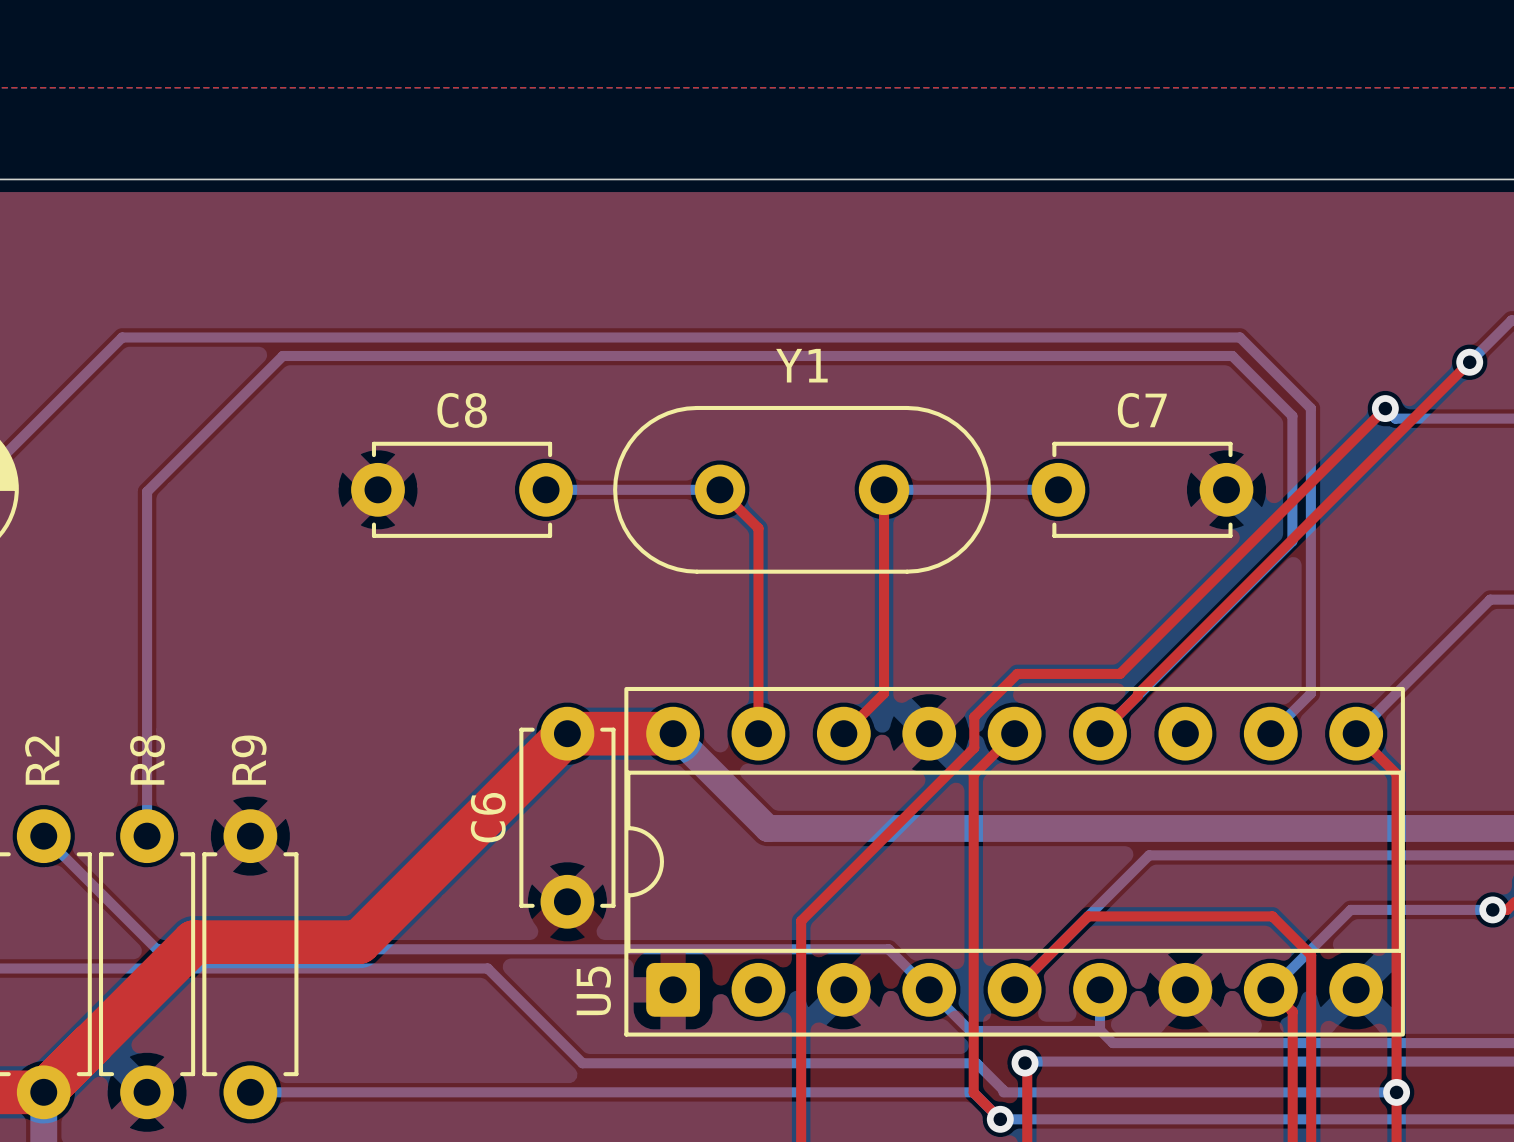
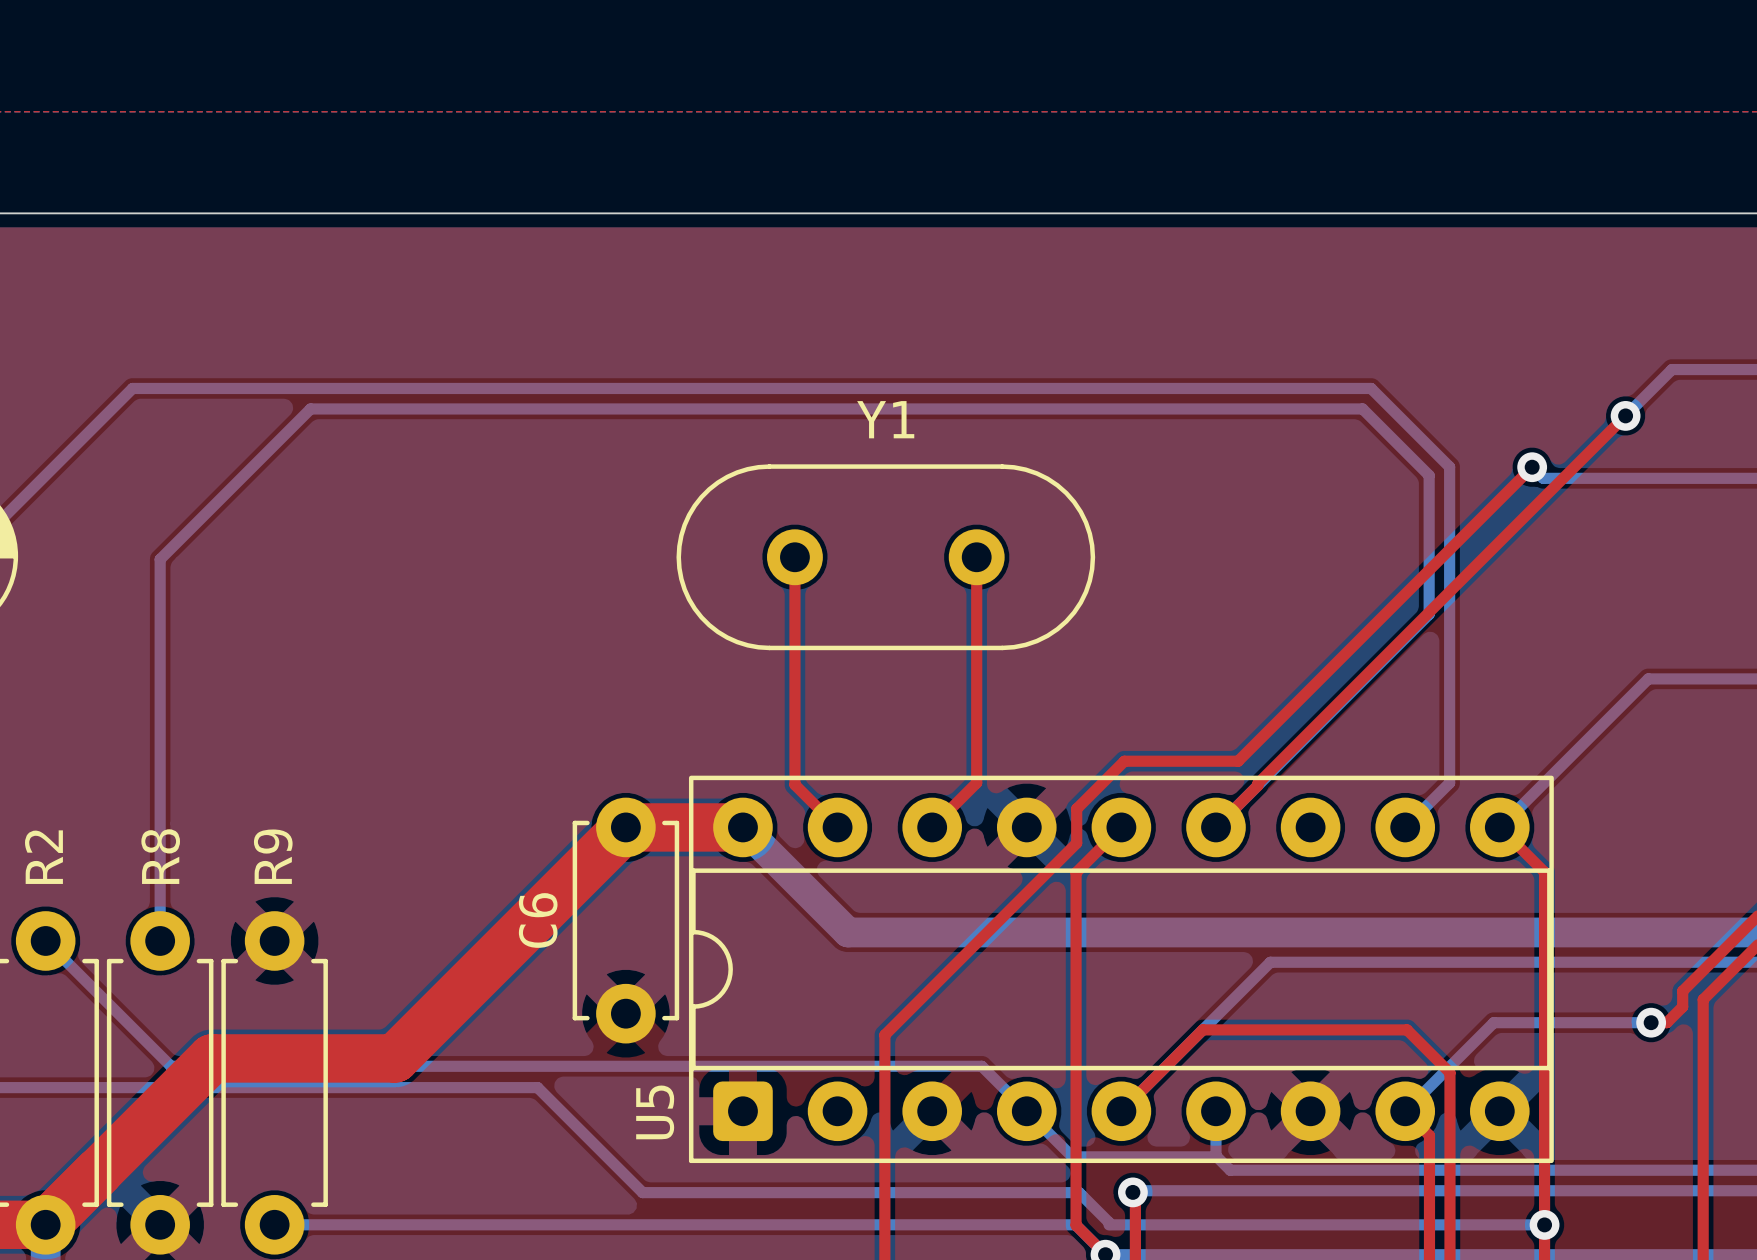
C8: (462, 489) -> none
bottom track: (546, 489) (719, 489) -> none
top track: (720, 489) (758, 528) (758, 733) -> (794, 557) (794, 784) (837, 827)
bottom track: (884, 489) (1058, 489) -> none
C7: (1142, 489) -> none

